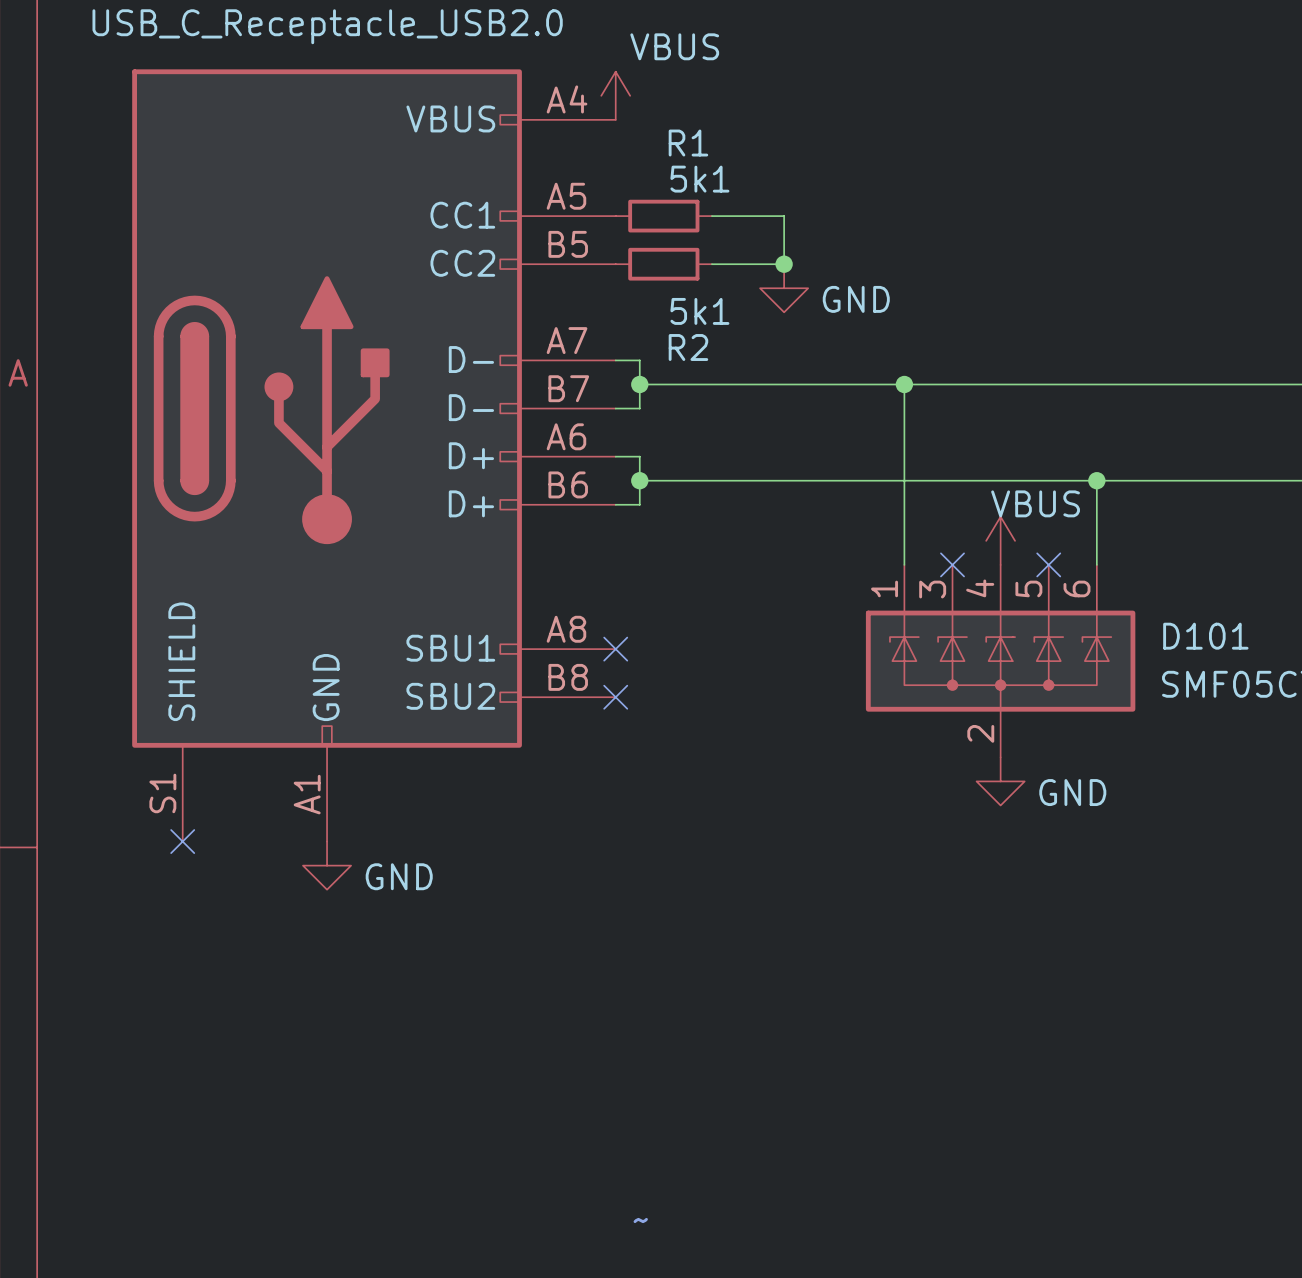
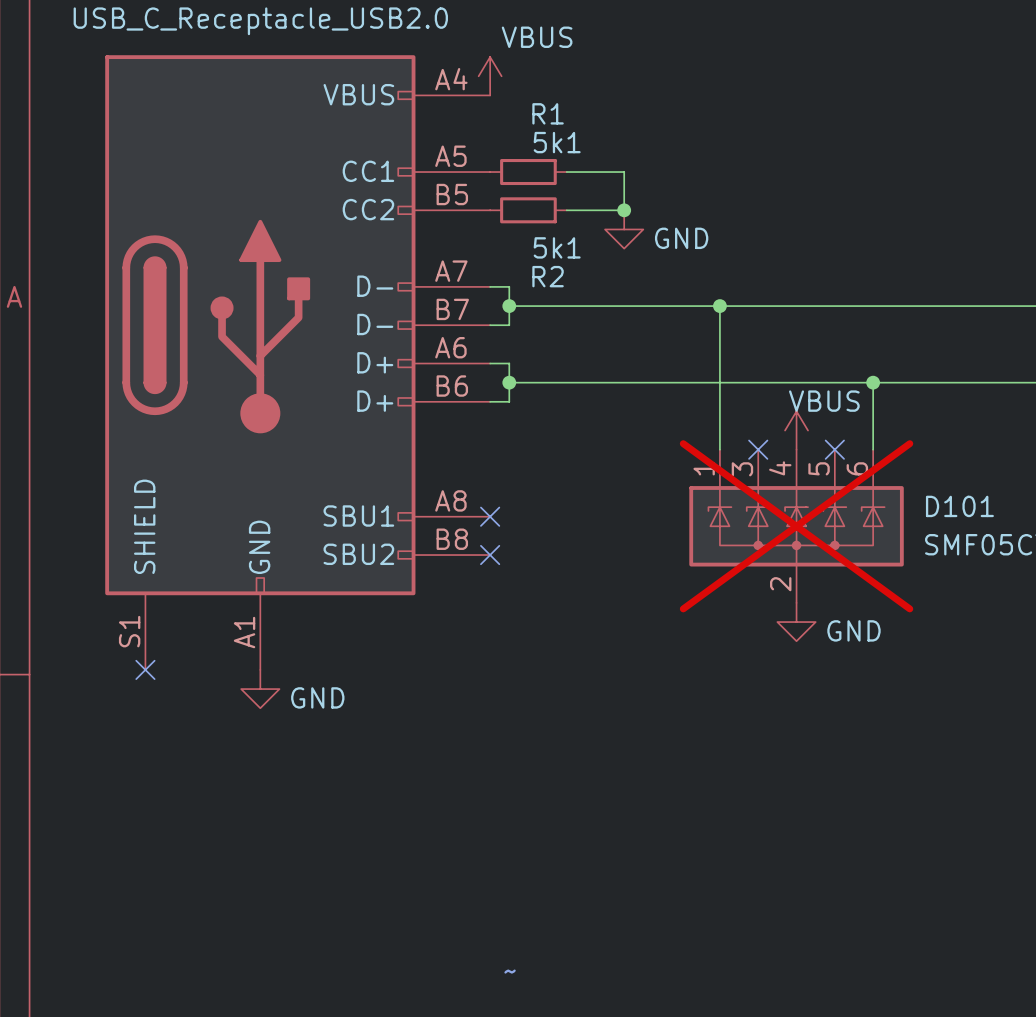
D101 do-not-place cross: none -> (796, 526)

